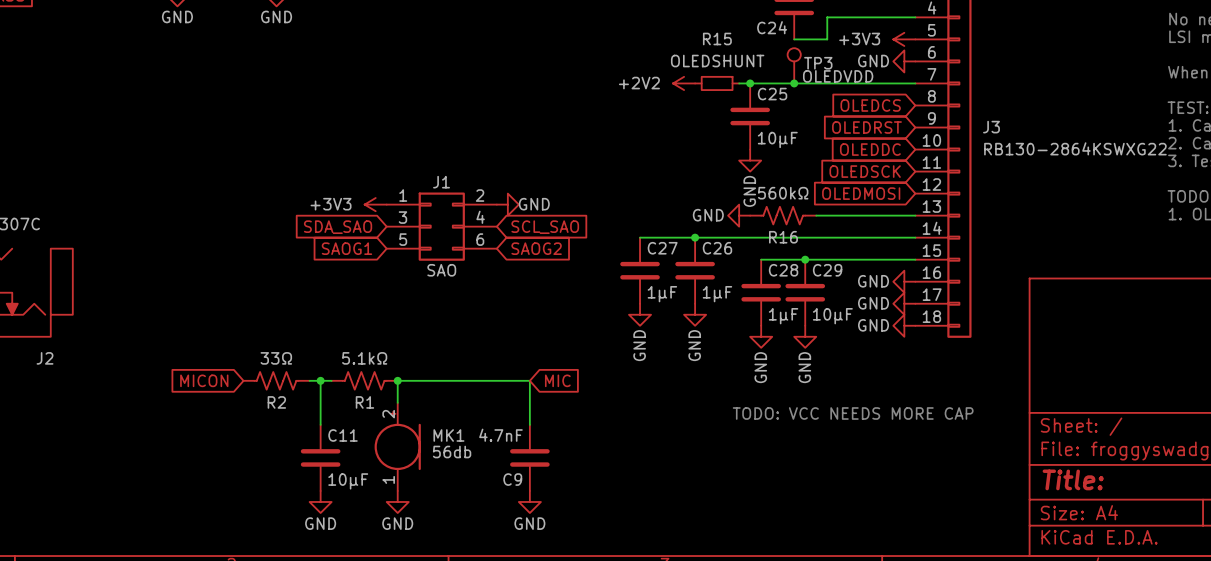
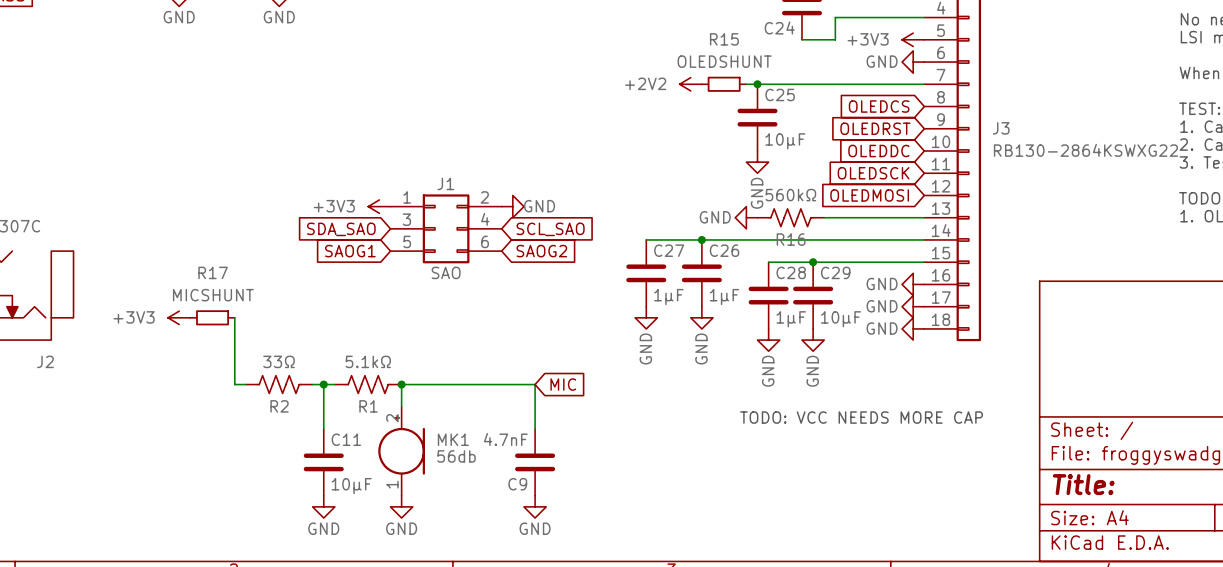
TP3: OLEDVDD (794, 65) -> none
junction: (794, 83) -> none
power symbol: none -> +3V3 (179, 317)
R17: none -> MICSHUNT (212, 317)
wire: none -> (234, 317) (234, 384) (245, 384)
global label: MICON (204, 380) -> none

